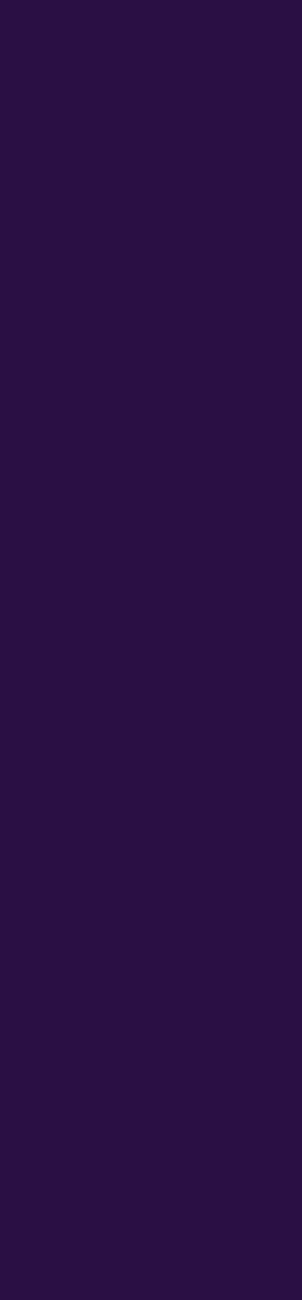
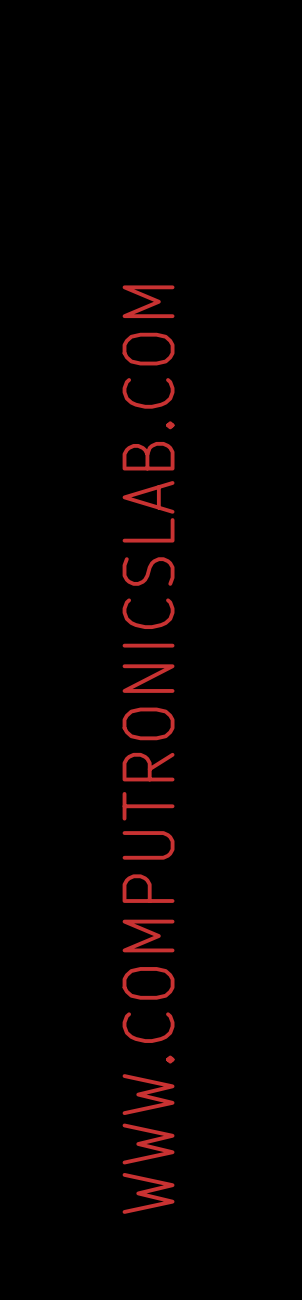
text: none -> WWW.COMPUTRONICSLAB.COM (148, 749)

